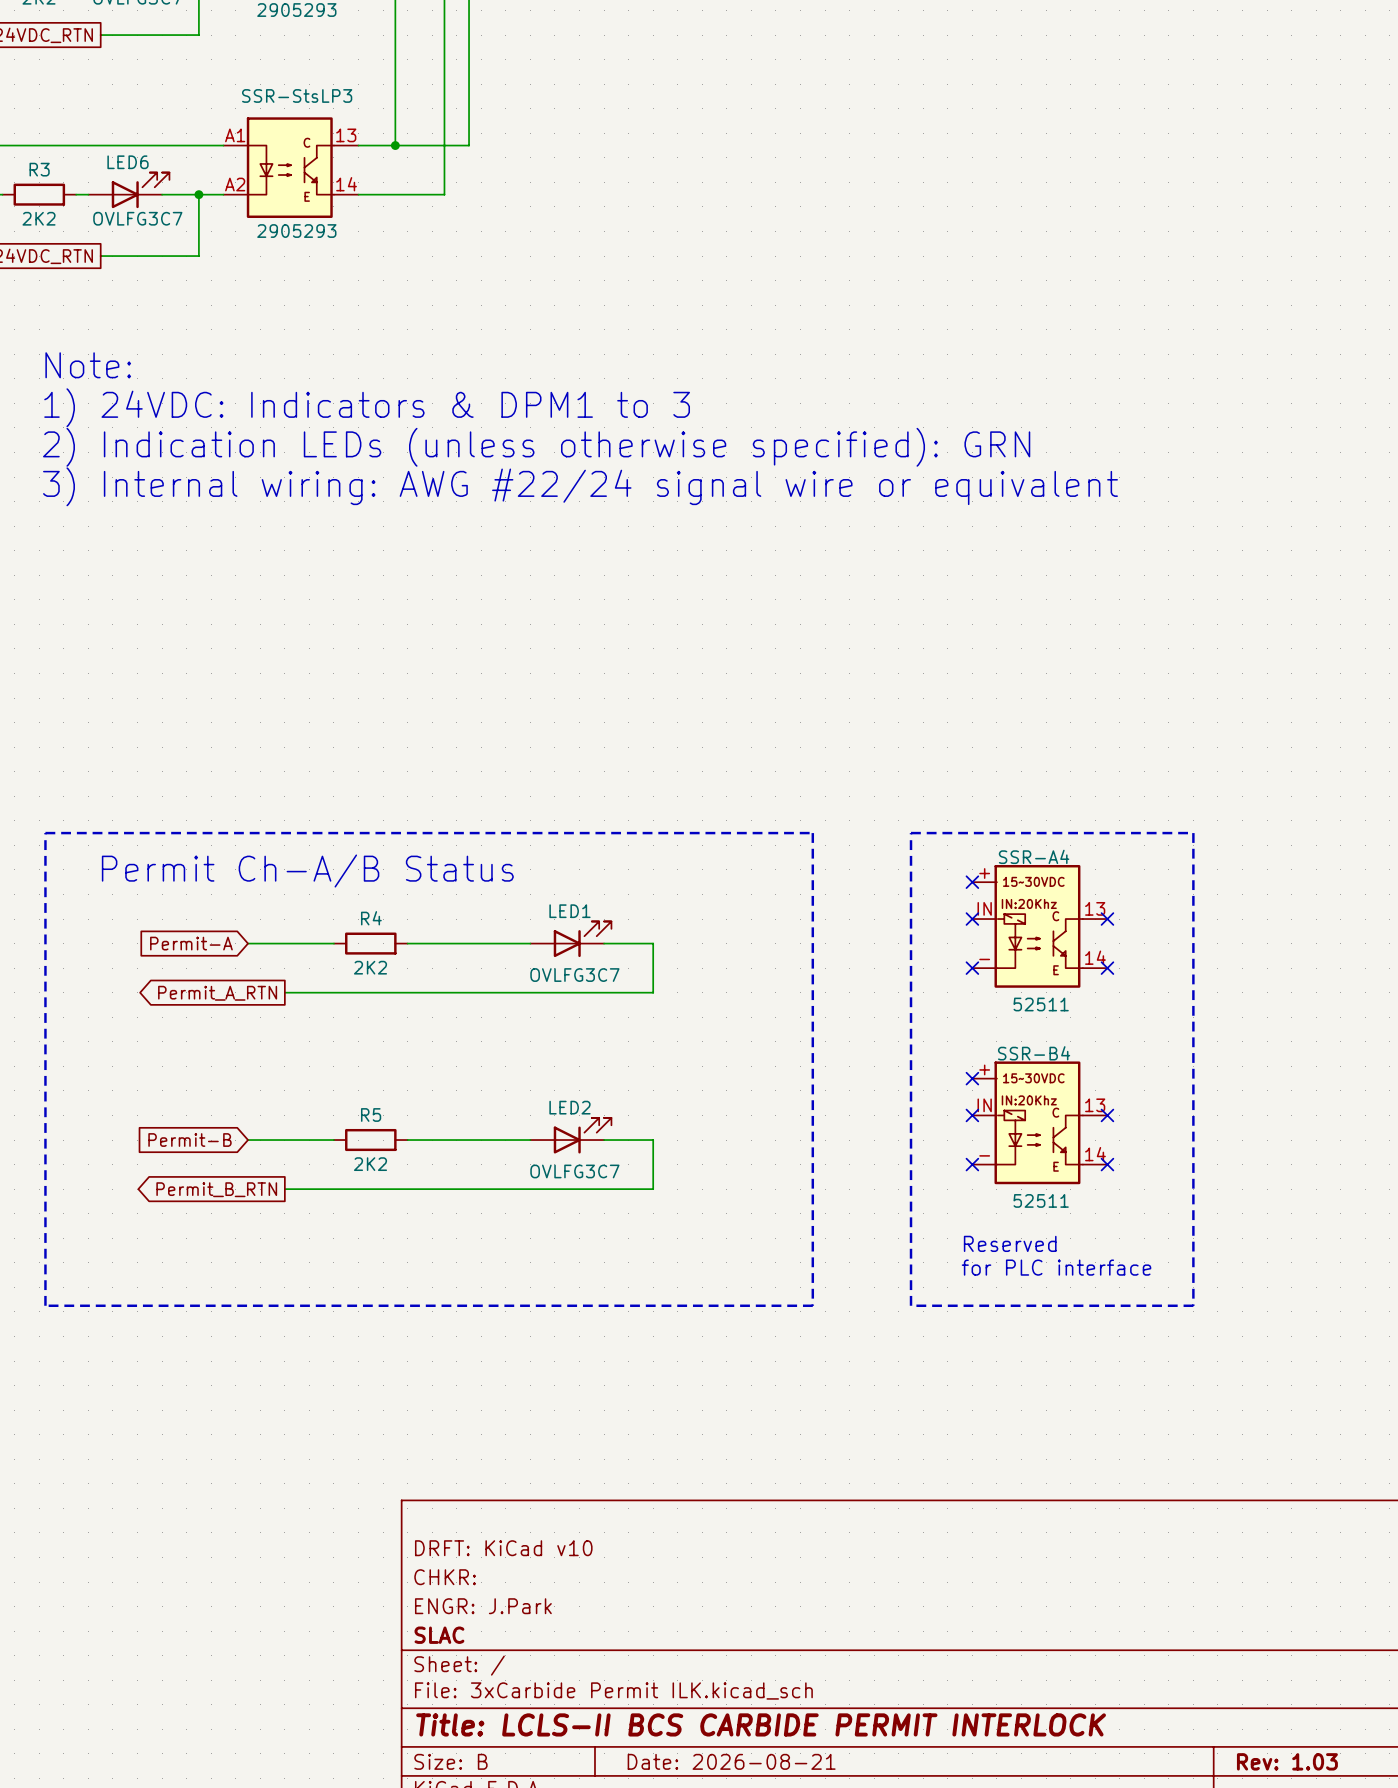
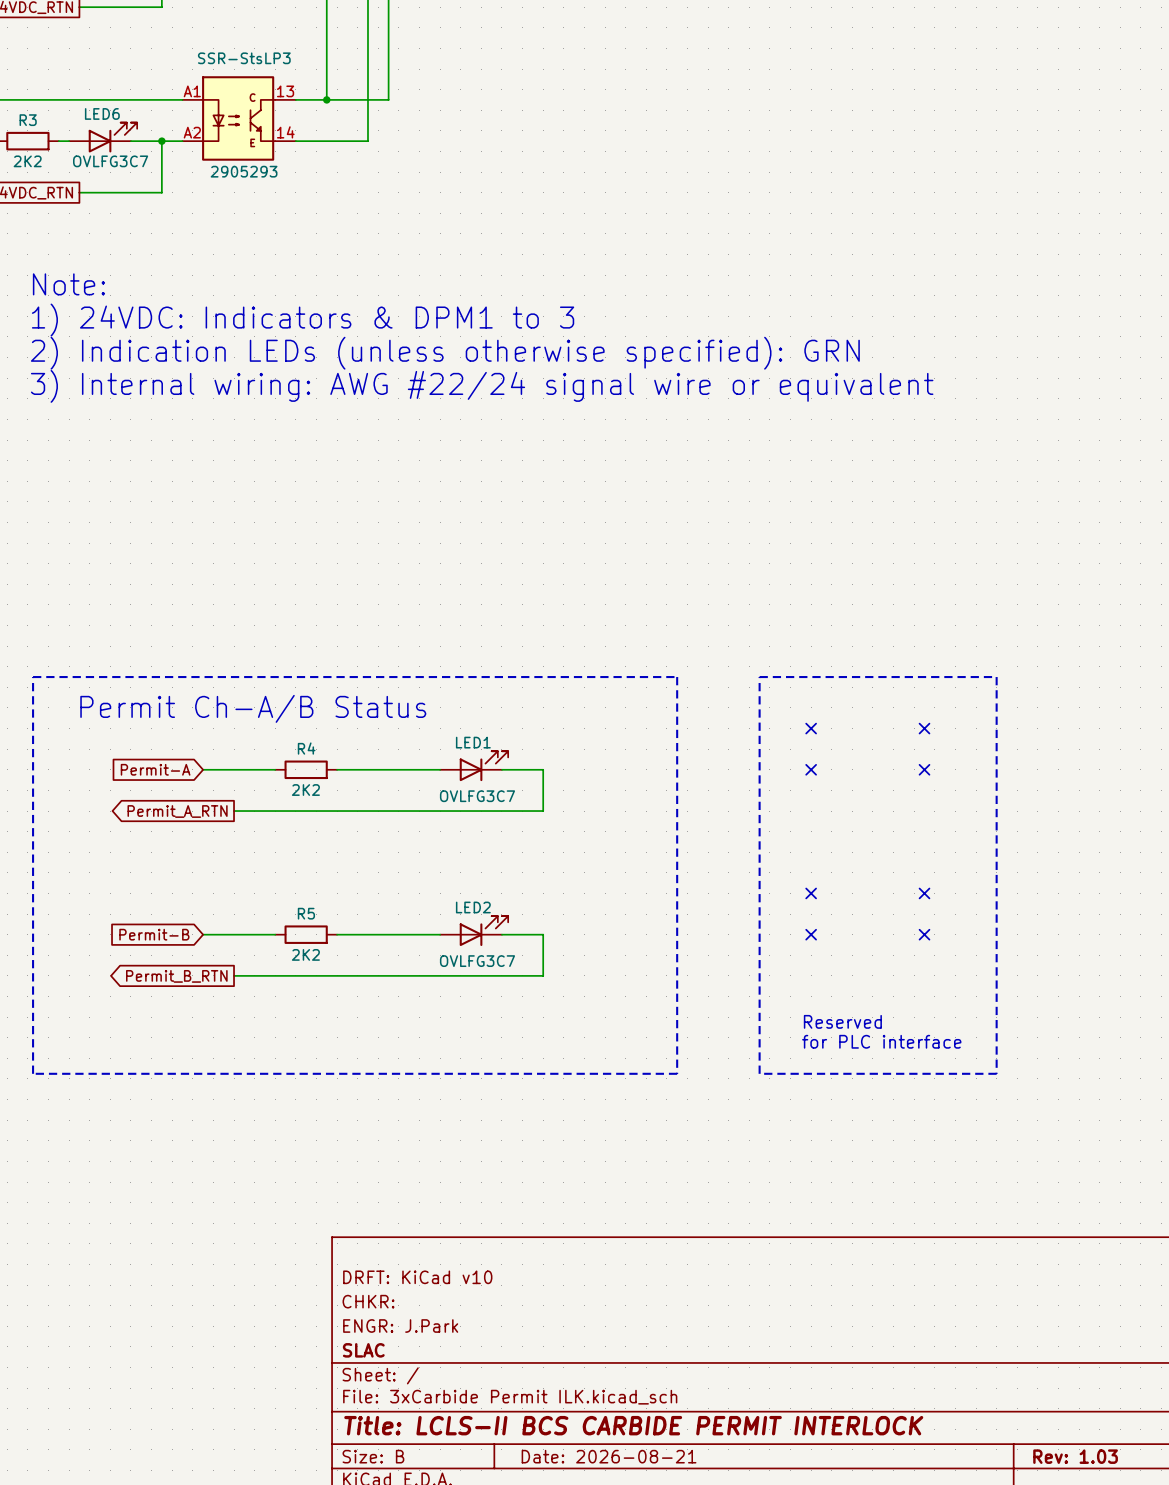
no-connect mark: (972, 882) -> none
no-connect mark: none -> (811, 728)
no-connect mark: none -> (924, 728)
no-connect mark: (972, 919) -> none
no-connect mark: (1107, 919) -> none
SSR-A4: 52511 (1039, 926) -> none
no-connect mark: none -> (811, 769)
no-connect mark: none -> (924, 769)
no-connect mark: (972, 968) -> none
no-connect mark: (1107, 968) -> none
no-connect mark: (972, 1078) -> none
no-connect mark: none -> (811, 893)
no-connect mark: none -> (924, 893)
no-connect mark: (972, 1115) -> none
no-connect mark: (1107, 1115) -> none
SSR-B4: 52511 (1039, 1122) -> none
no-connect mark: none -> (811, 934)
no-connect mark: none -> (924, 934)
no-connect mark: (972, 1164) -> none
no-connect mark: (1107, 1164) -> none

